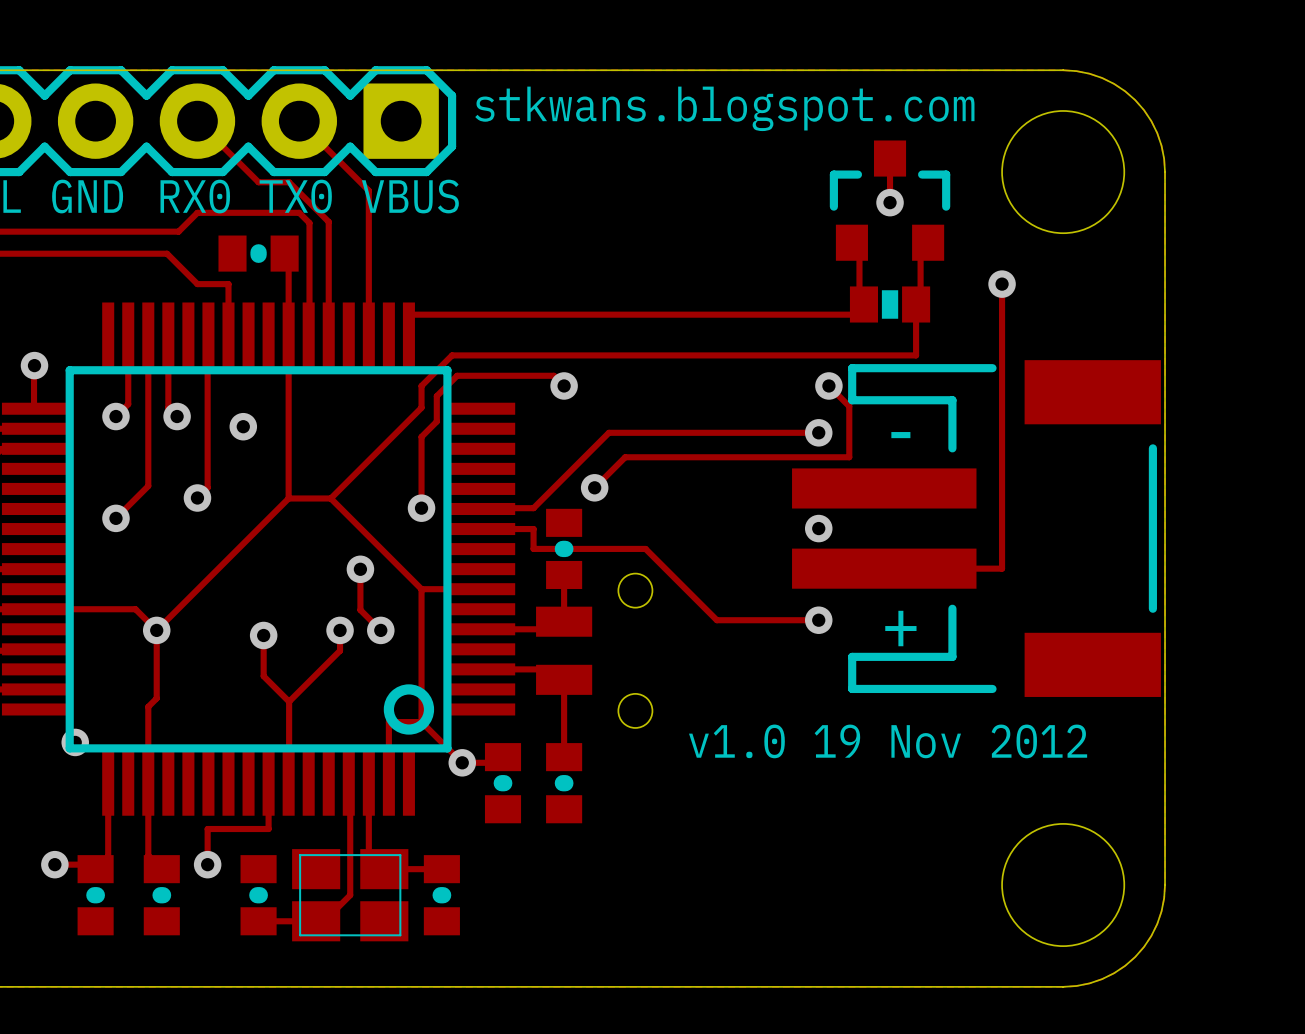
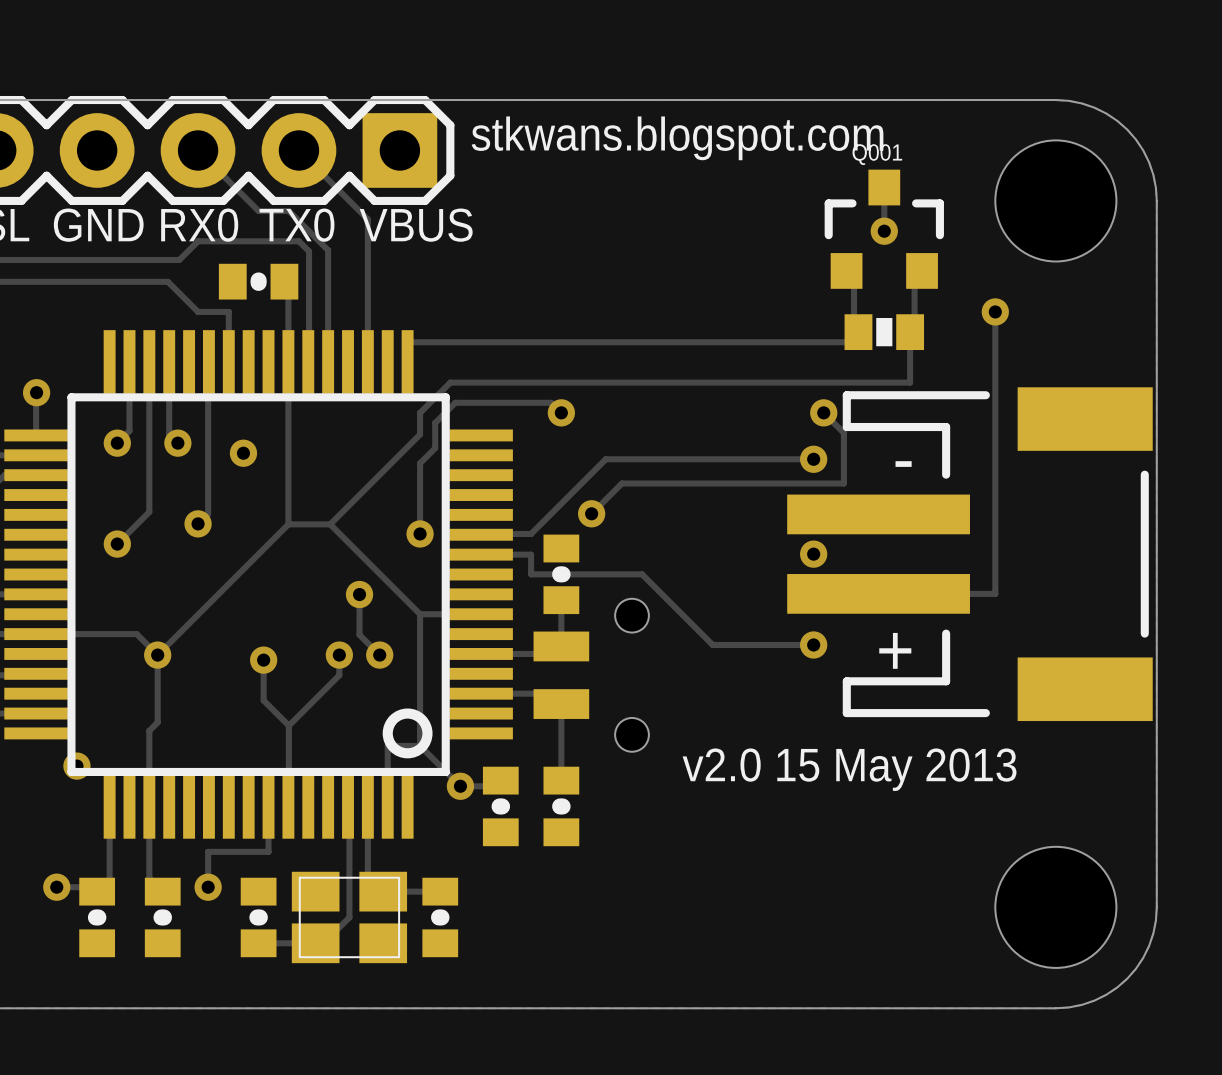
Q001 name: none -> Q001 (877, 154)
text: v1.0 19 Nov 2012 (888, 741) -> v2.0 15 May 2013 (849, 769)

